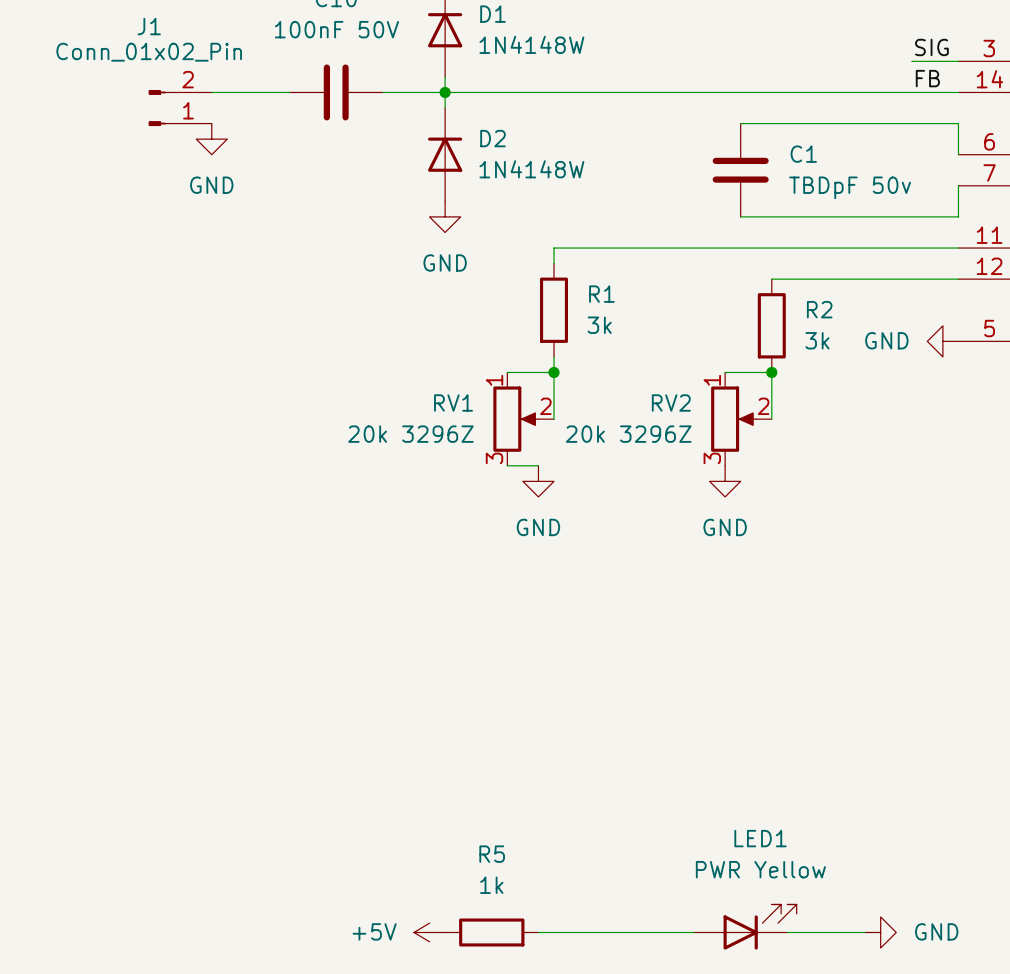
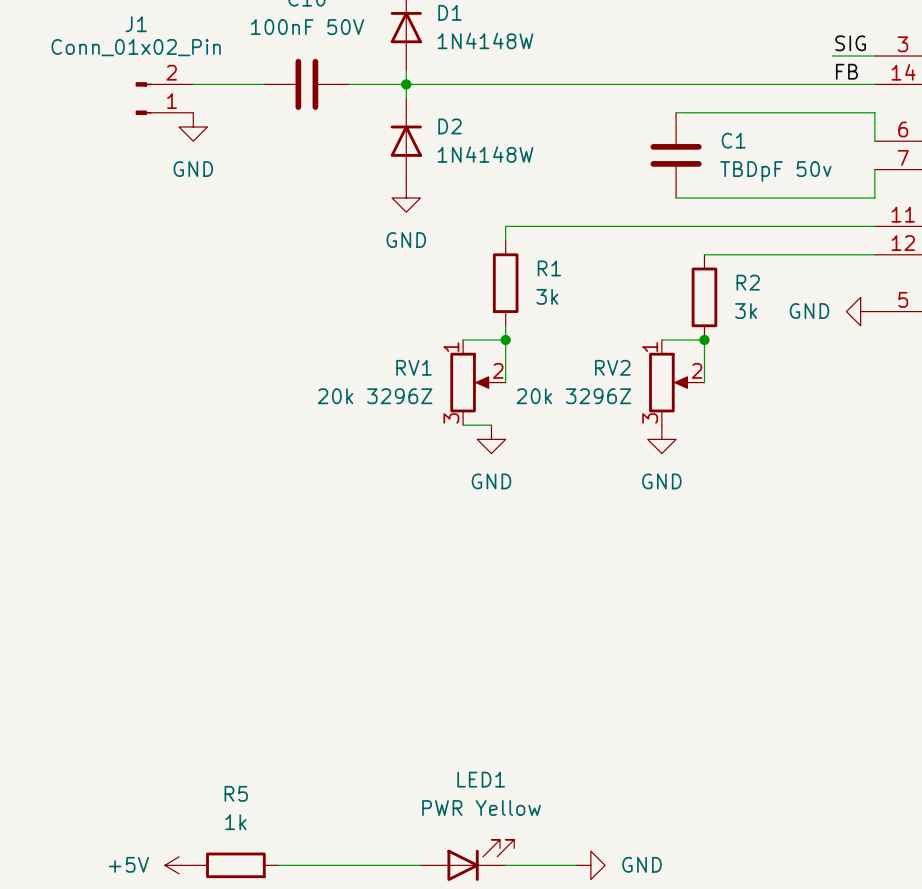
LED1 position: (745, 927) -> (467, 860)
power symbol position: +5V (429, 932) -> +5V (179, 865)
R5 position: (491, 932) -> (235, 865)
wire: (538, 932) (694, 932) -> (278, 865) (420, 865)
wire: (787, 932) (865, 932) -> (505, 865) (576, 865)
power symbol position: GND (880, 932) -> GND (590, 865)

